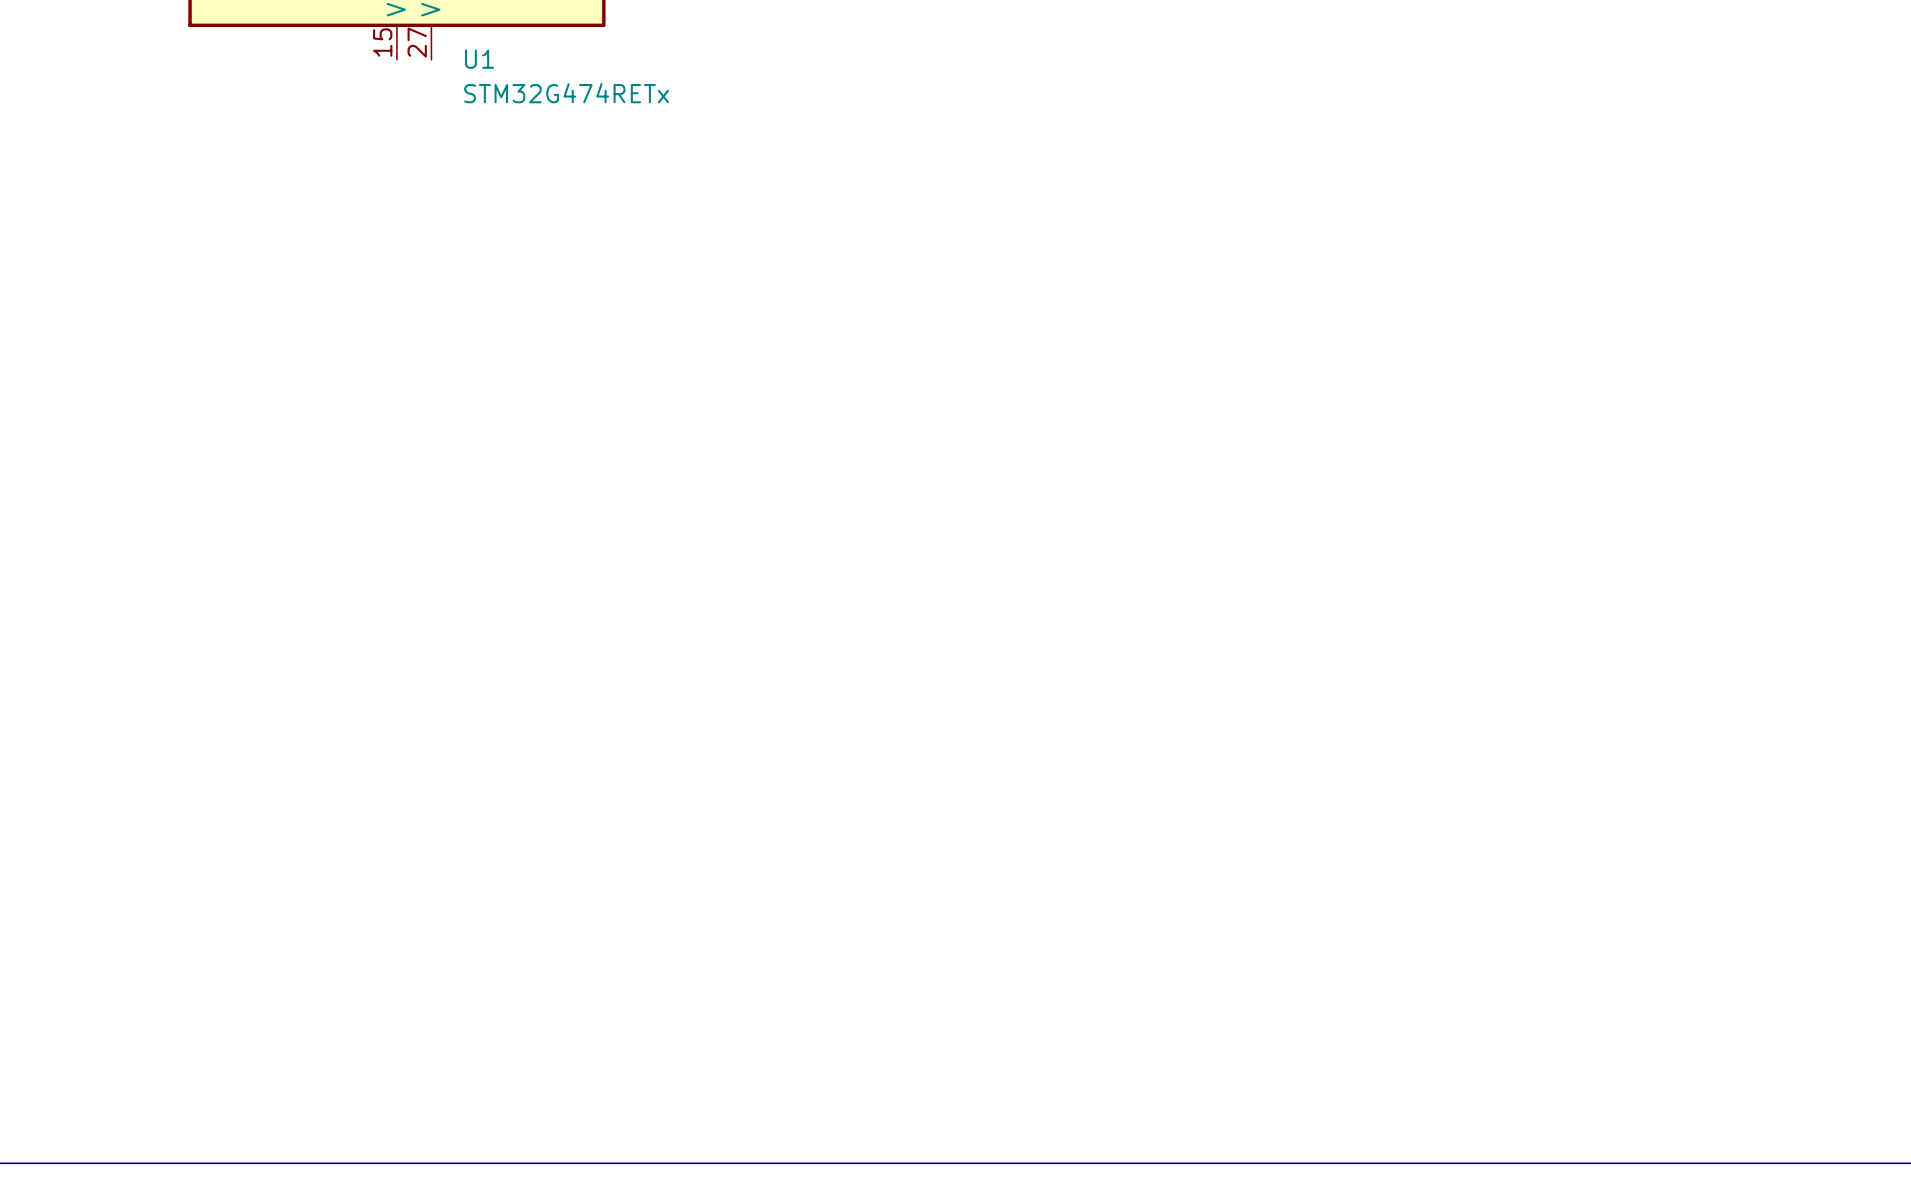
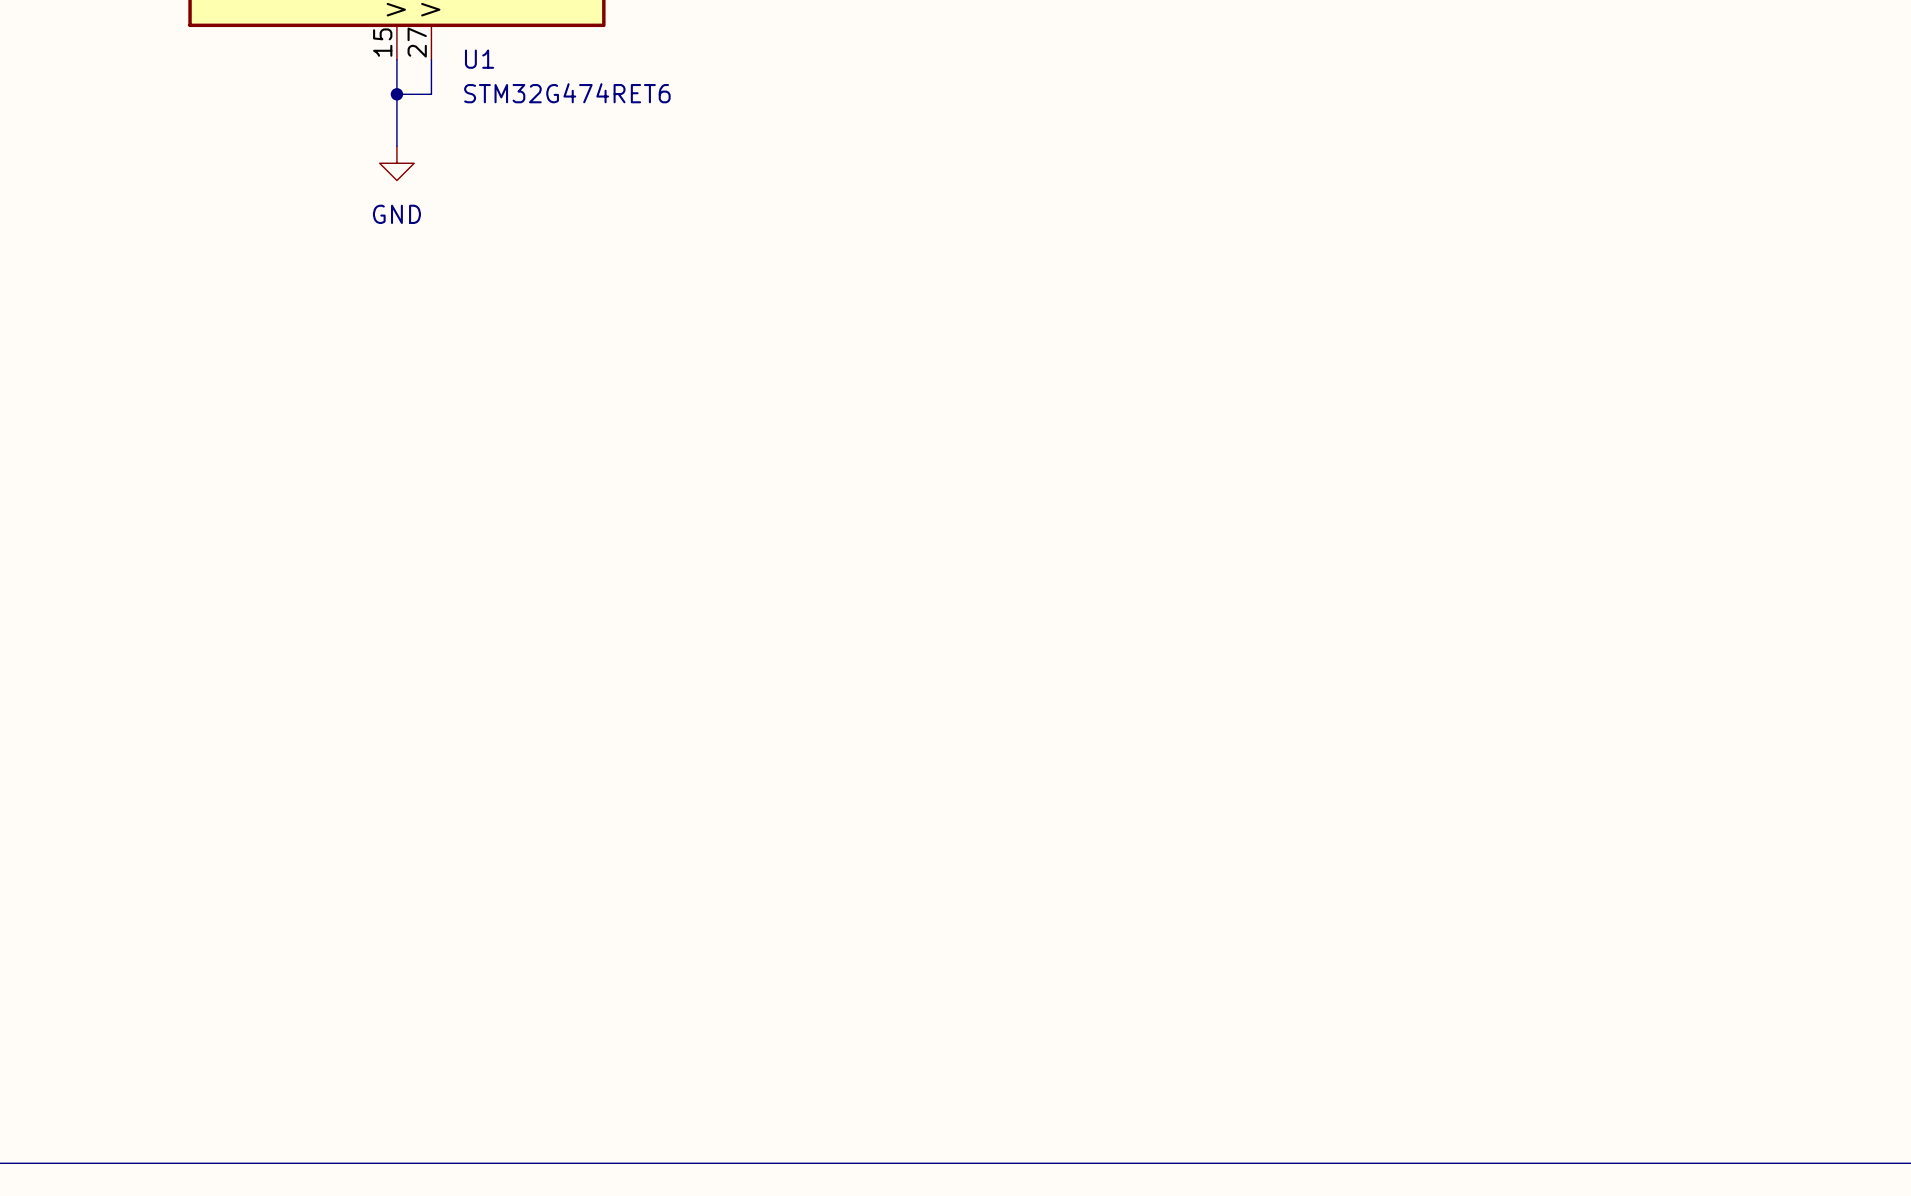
wire: none -> (396, 59) (396, 146)
wire: none -> (431, 59) (431, 94) (396, 94)
U1 value: STM32G474RETx (566, 93) -> STM32G474RET6 (567, 93)
junction: none -> (396, 94)
power symbol: none -> GND (396, 163)

